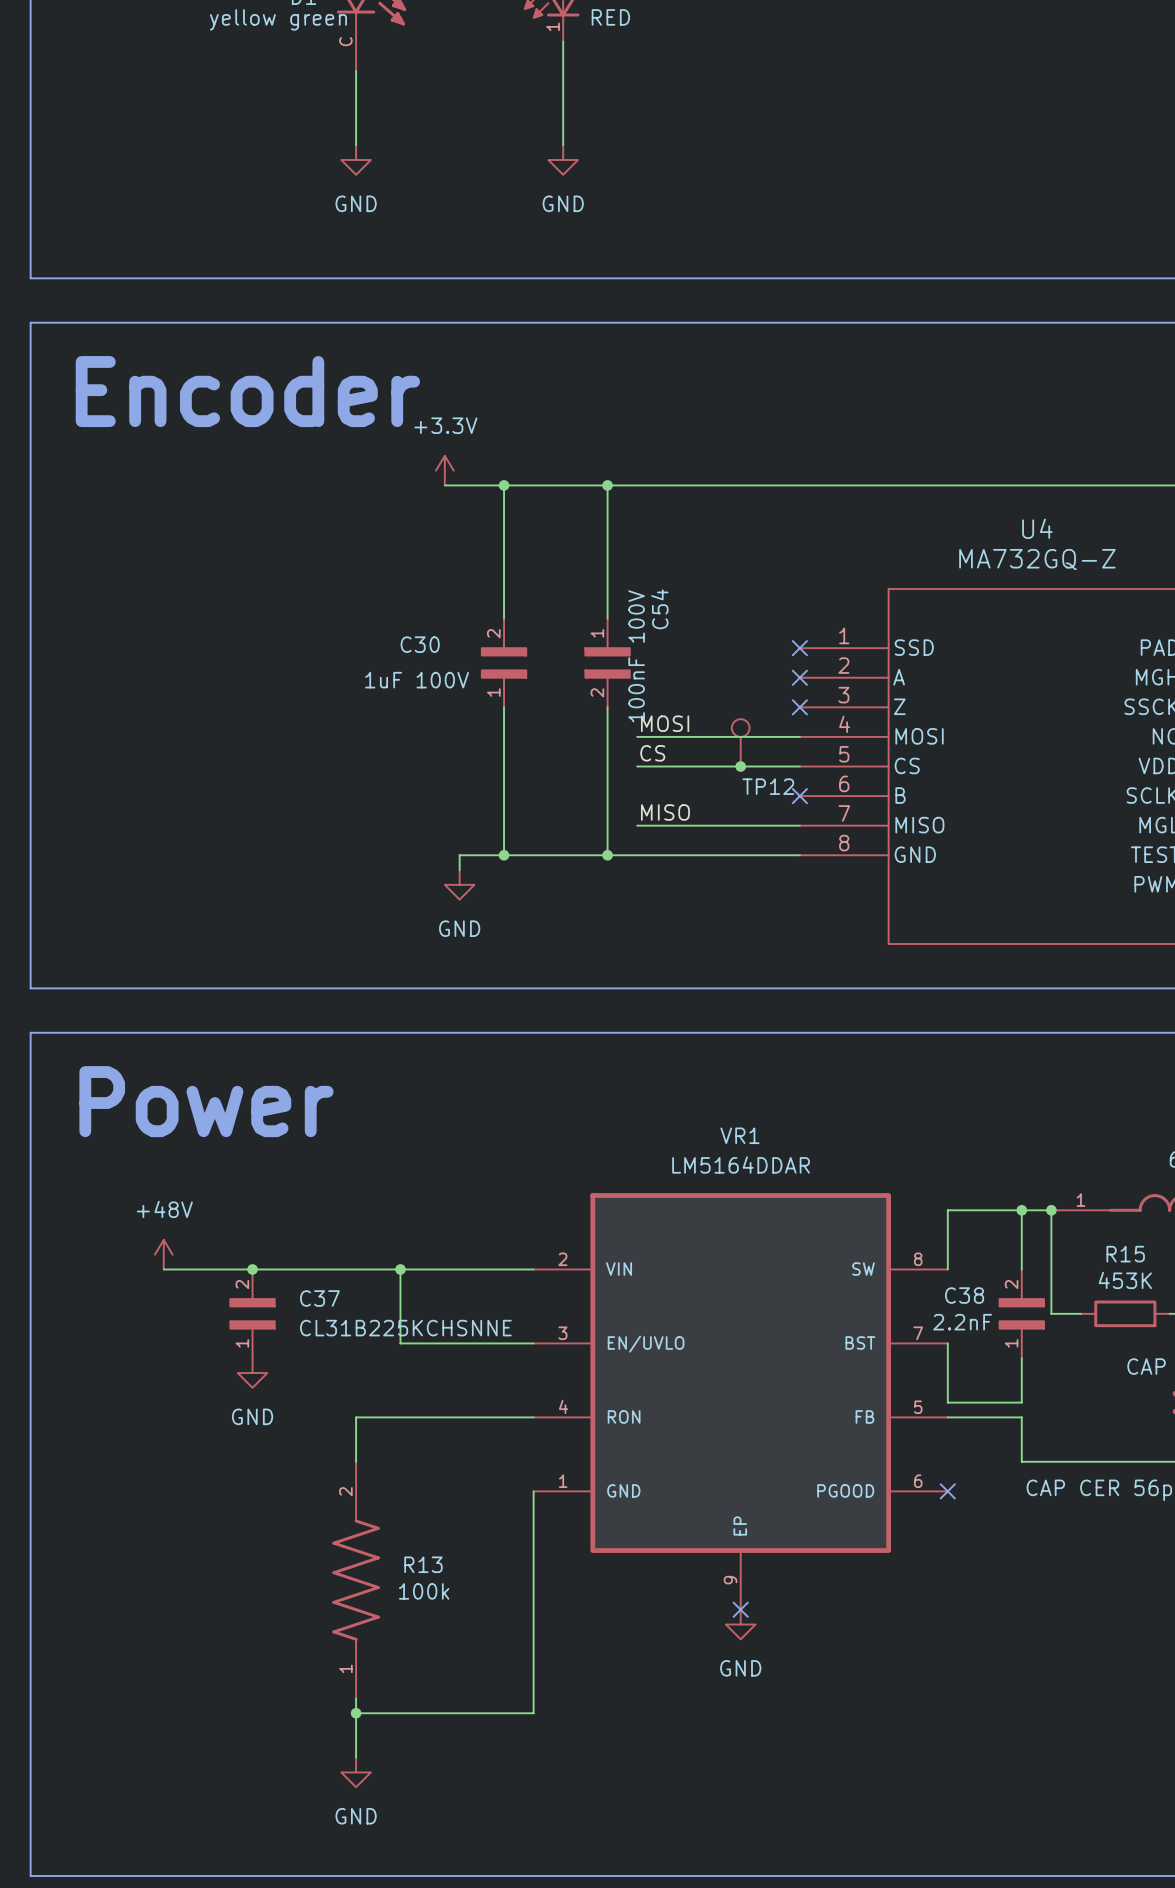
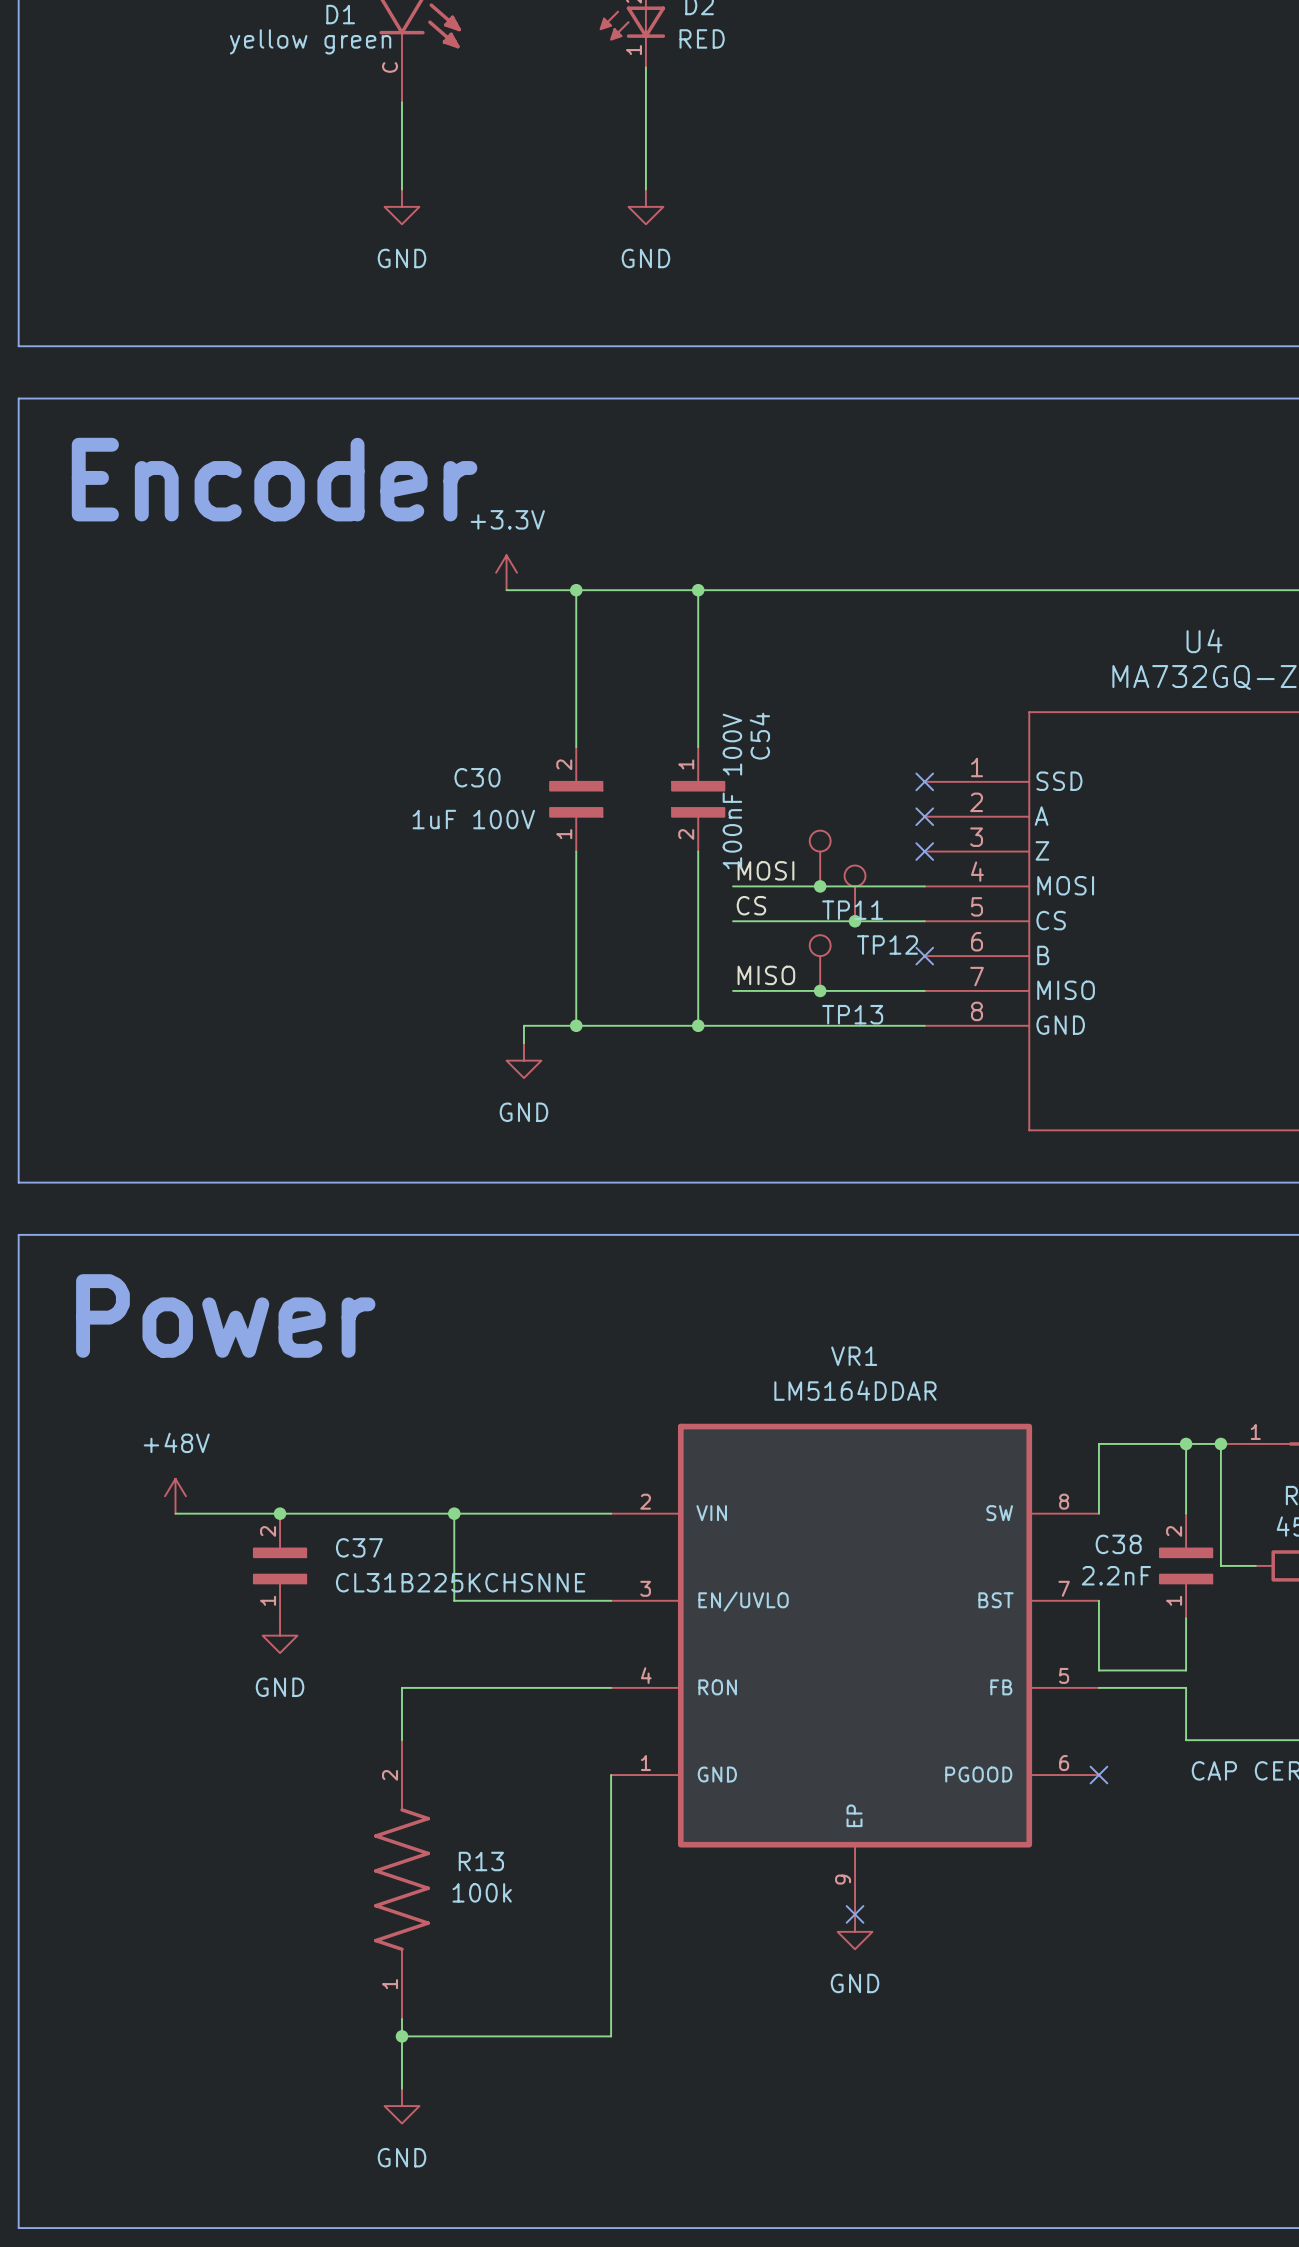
TP11: none -> (820, 858)
junction: none -> (820, 886)
TP13: none -> (820, 963)
junction: none -> (820, 990)

